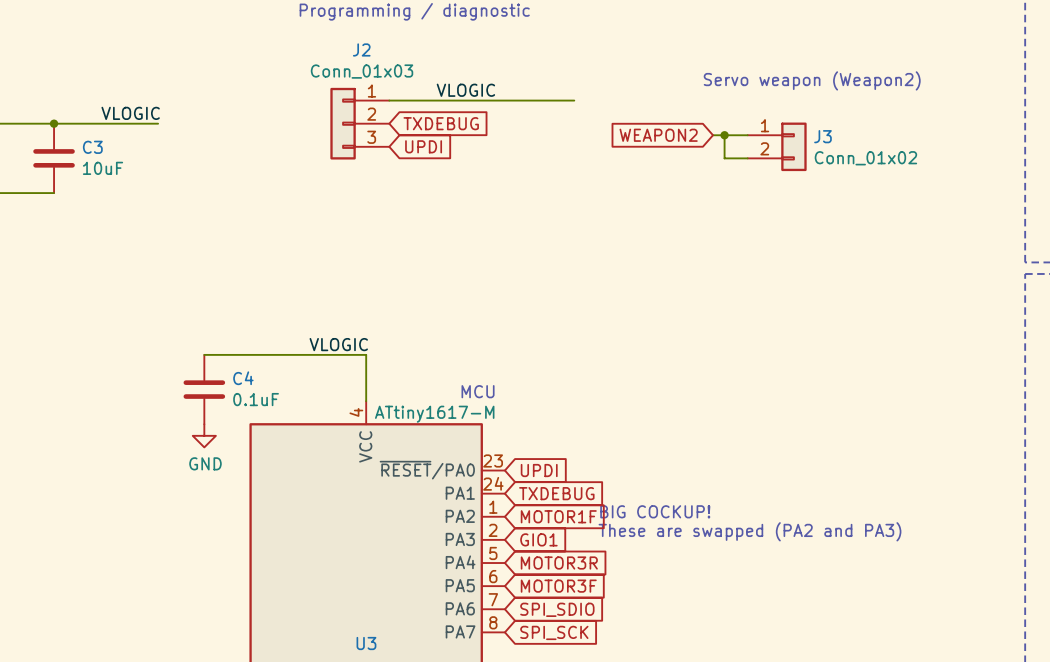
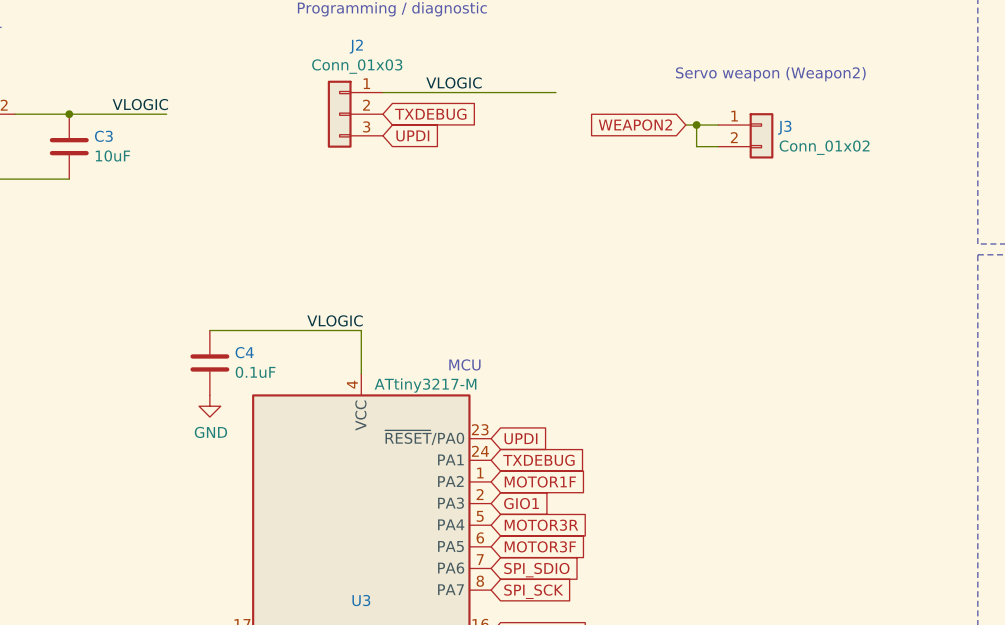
U3 value: ATtiny1617-M (434, 414) -> ATtiny3217-M (425, 385)
text: BIG COCKUP! (655, 511) -> none
text: These are swapped (PA2 and PA3) (749, 531) -> none

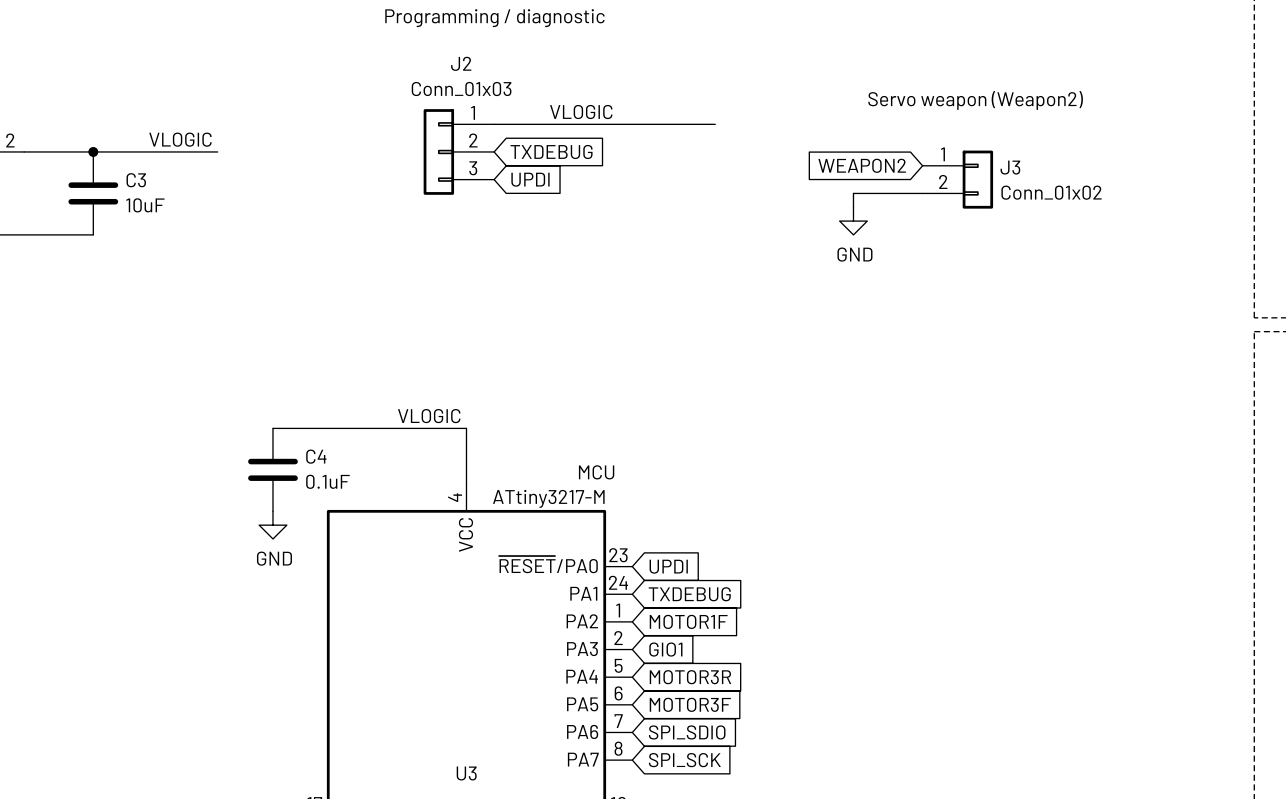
global label position: WEAPON2 (635, 125) -> WEAPON2 (862, 165)
wire: (685, 125) (718, 125) -> none
wire: (696, 125) (696, 146) -> (853, 207) (853, 193) (894, 193)
junction: (696, 125) -> none
power symbol: none -> GND (853, 221)

